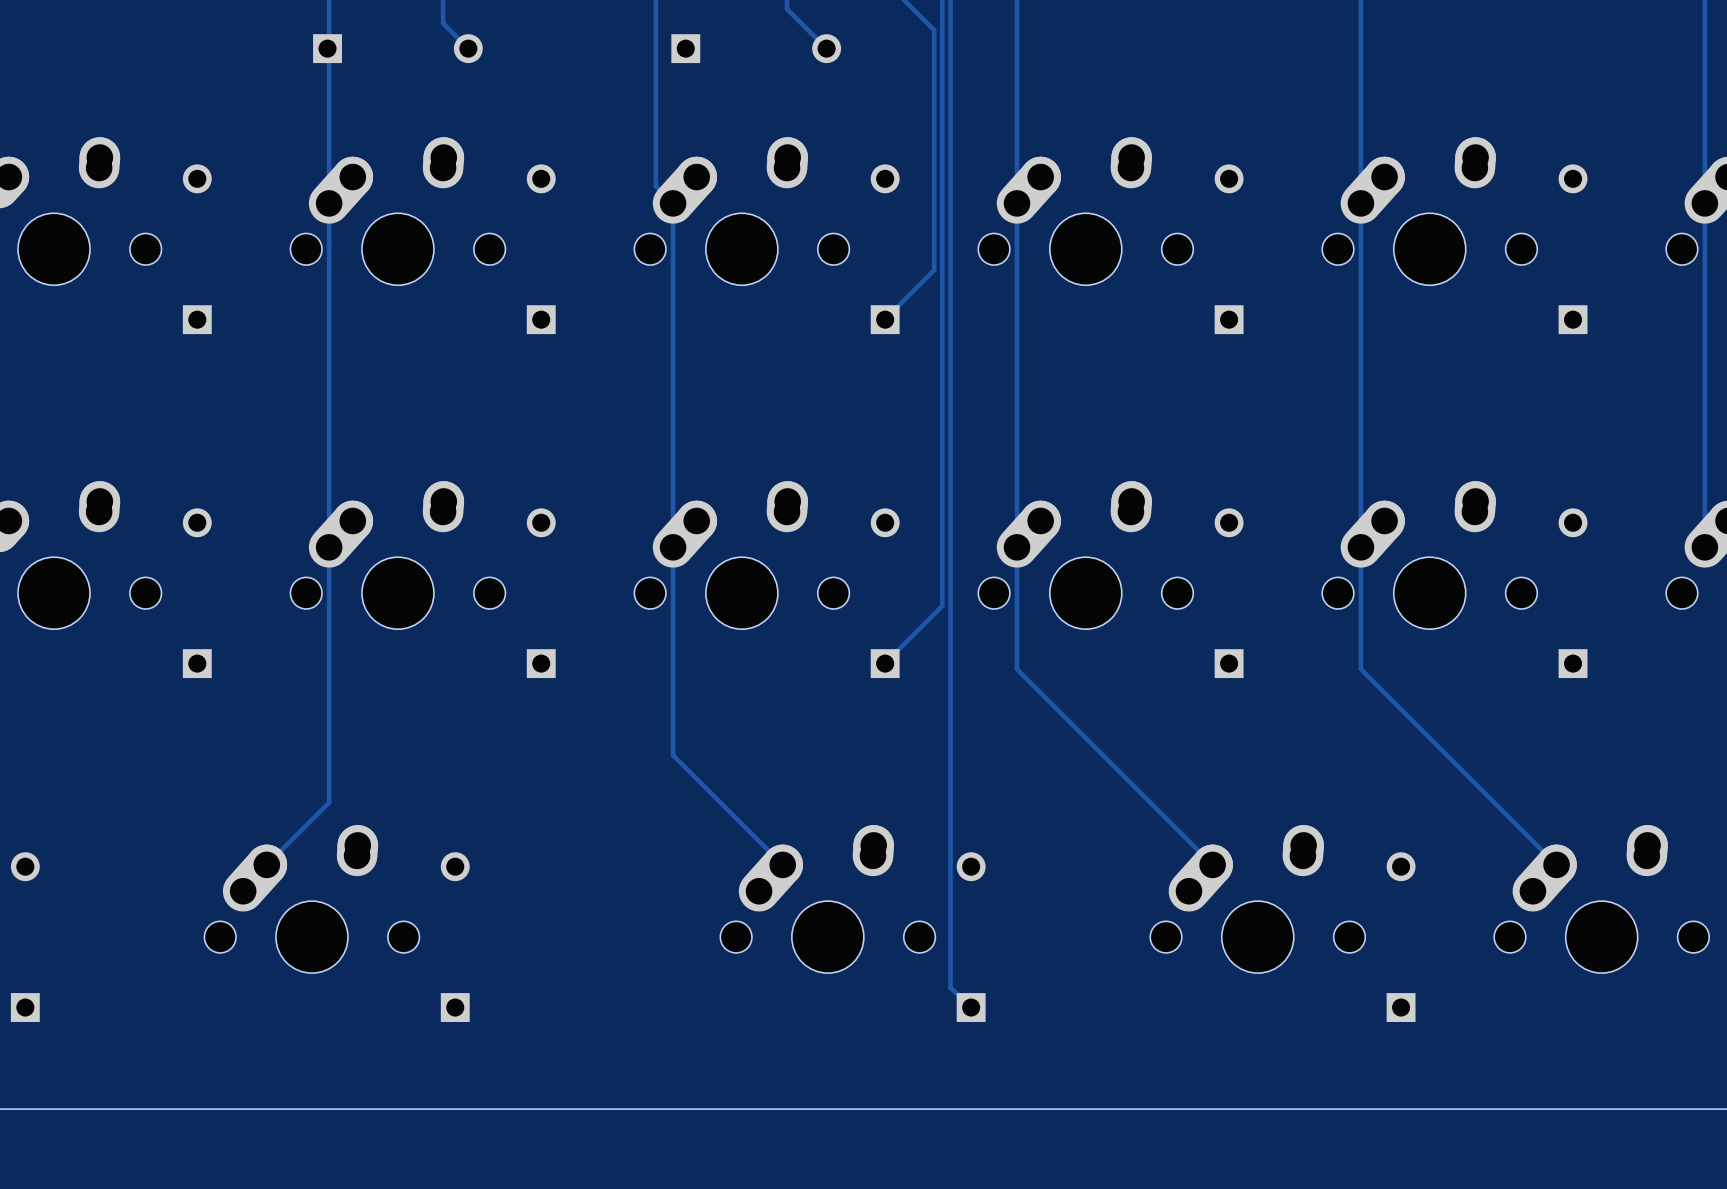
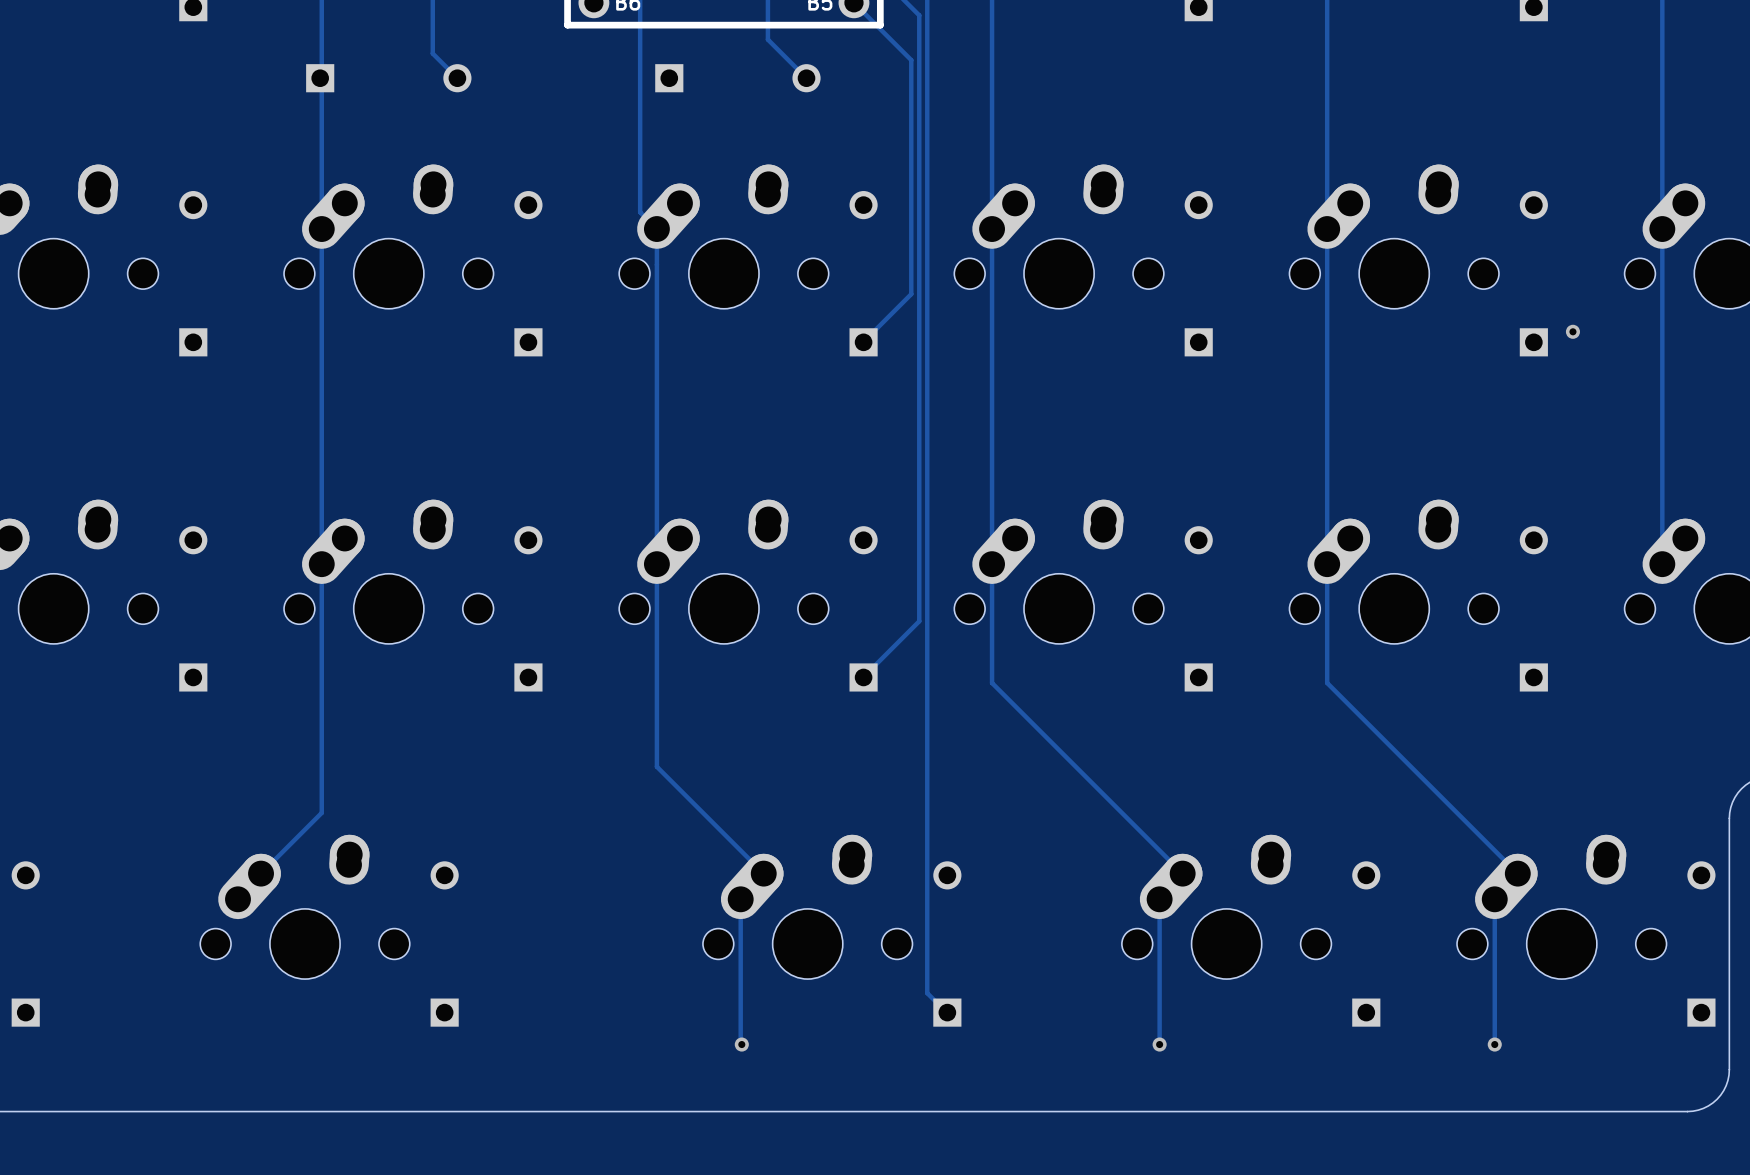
via: none -> (1572, 331)
track: none -> (740, 899) (741, 1044)
track: none -> (1159, 899) (1159, 1044)
track: none -> (1494, 899) (1494, 1044)
via: none -> (741, 1044)
via: none -> (1159, 1044)
via: none -> (1494, 1044)

